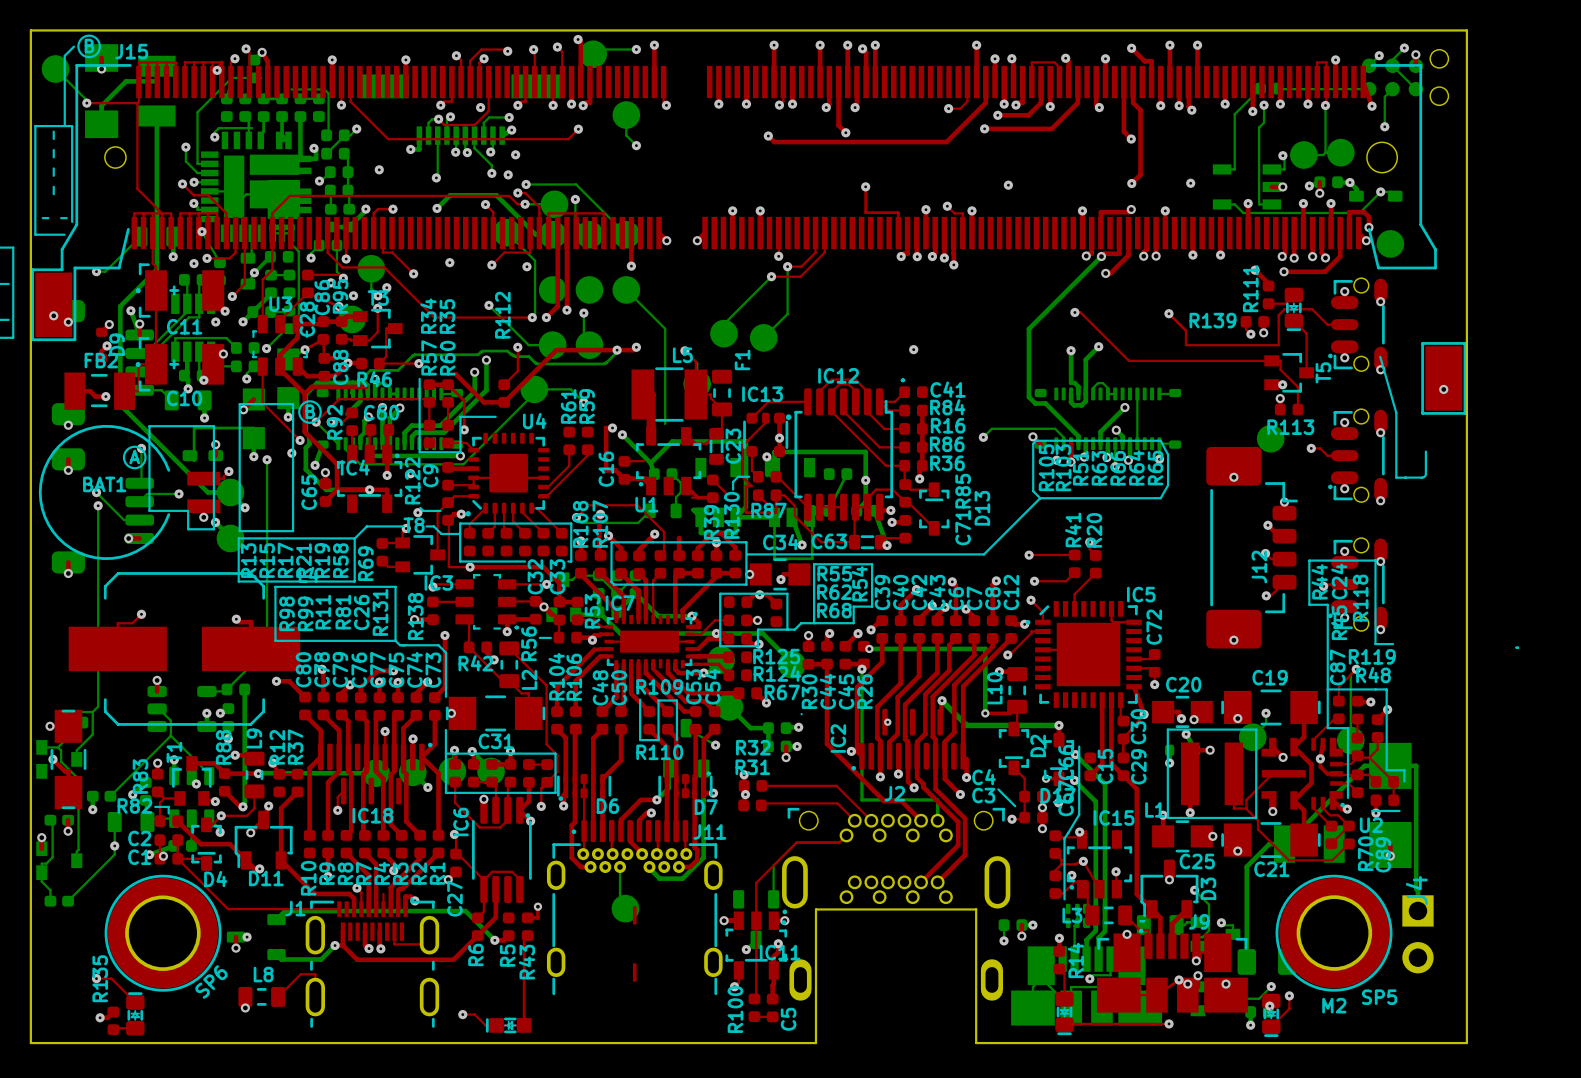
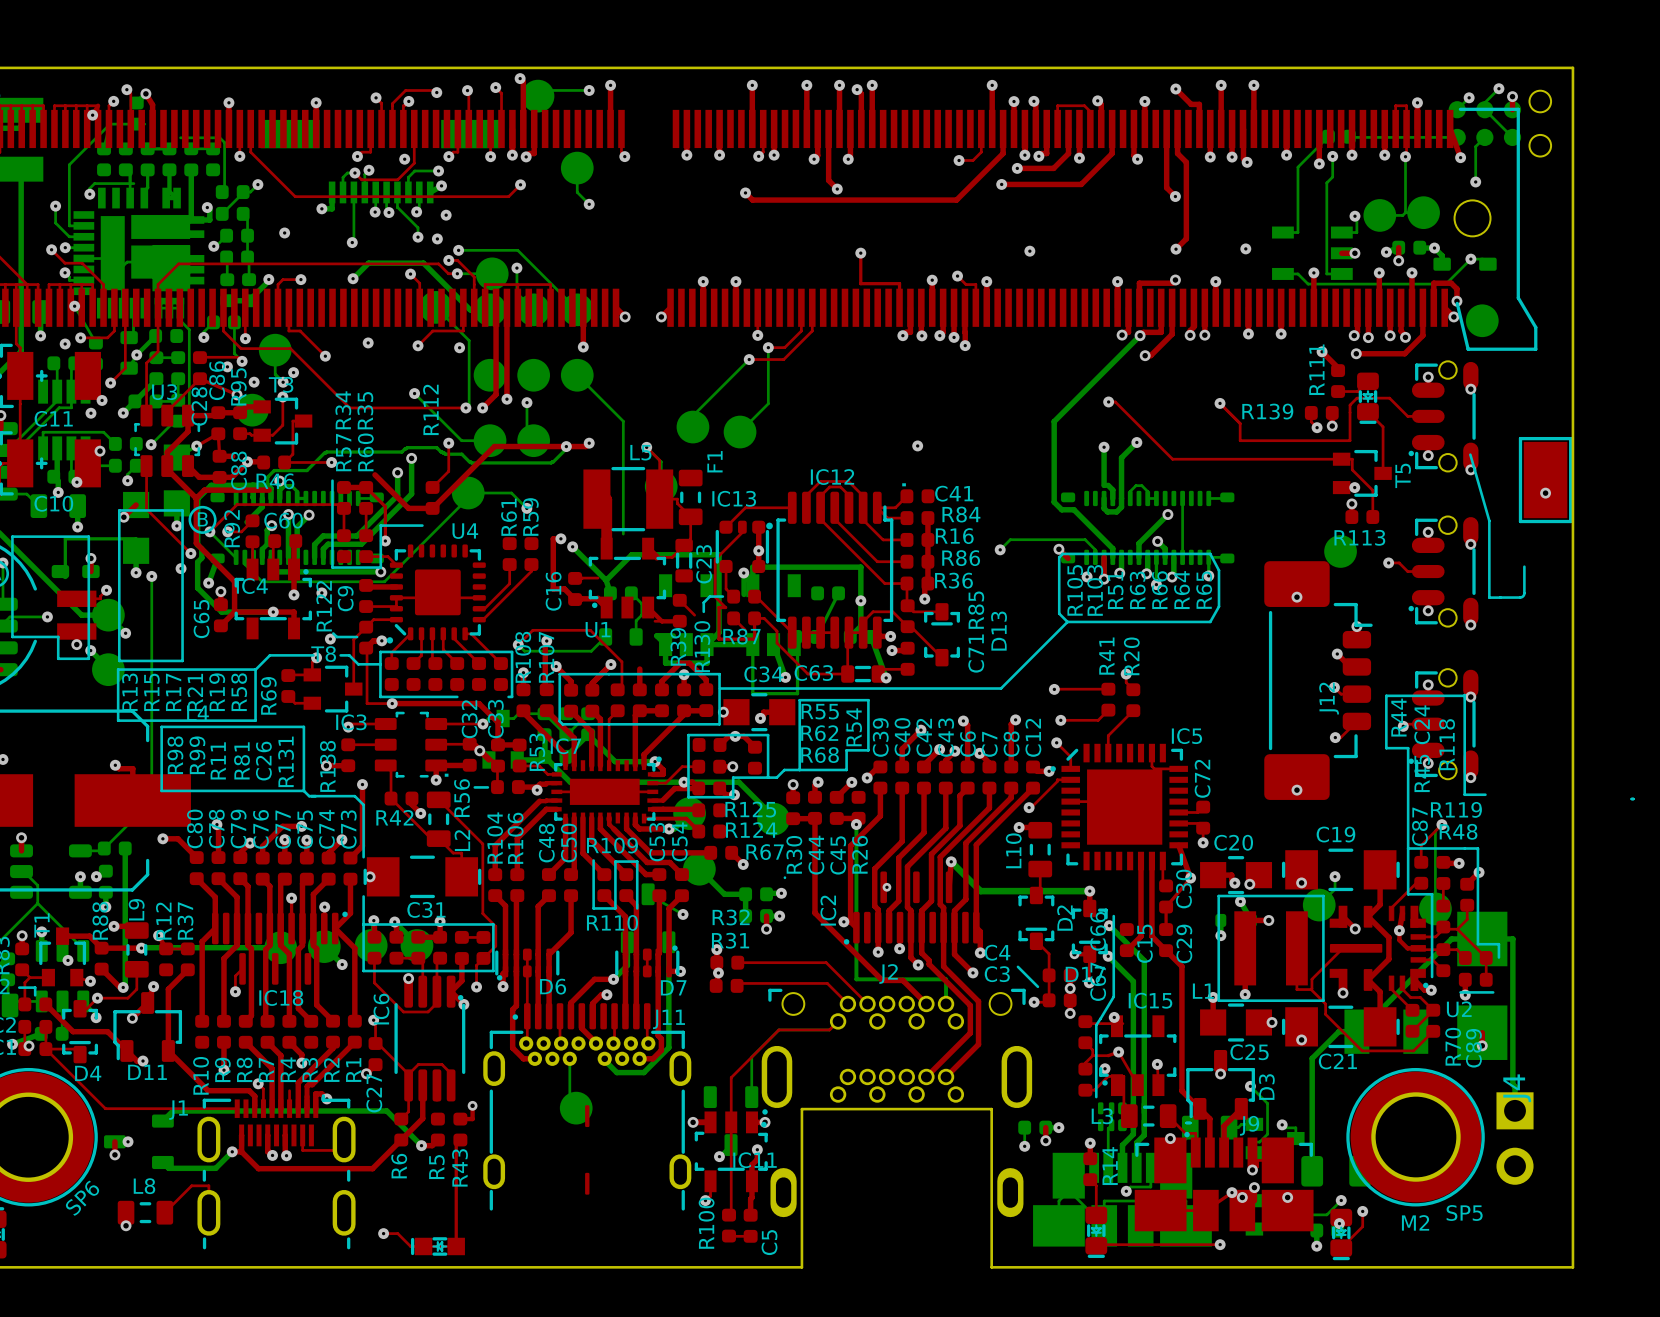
bottom track: (869, 648) (985, 648) (985, 713) -> none
via: (869, 648) -> none
top track: (1017, 706) (1010, 713) (985, 713) -> none
via: (985, 713) -> none

